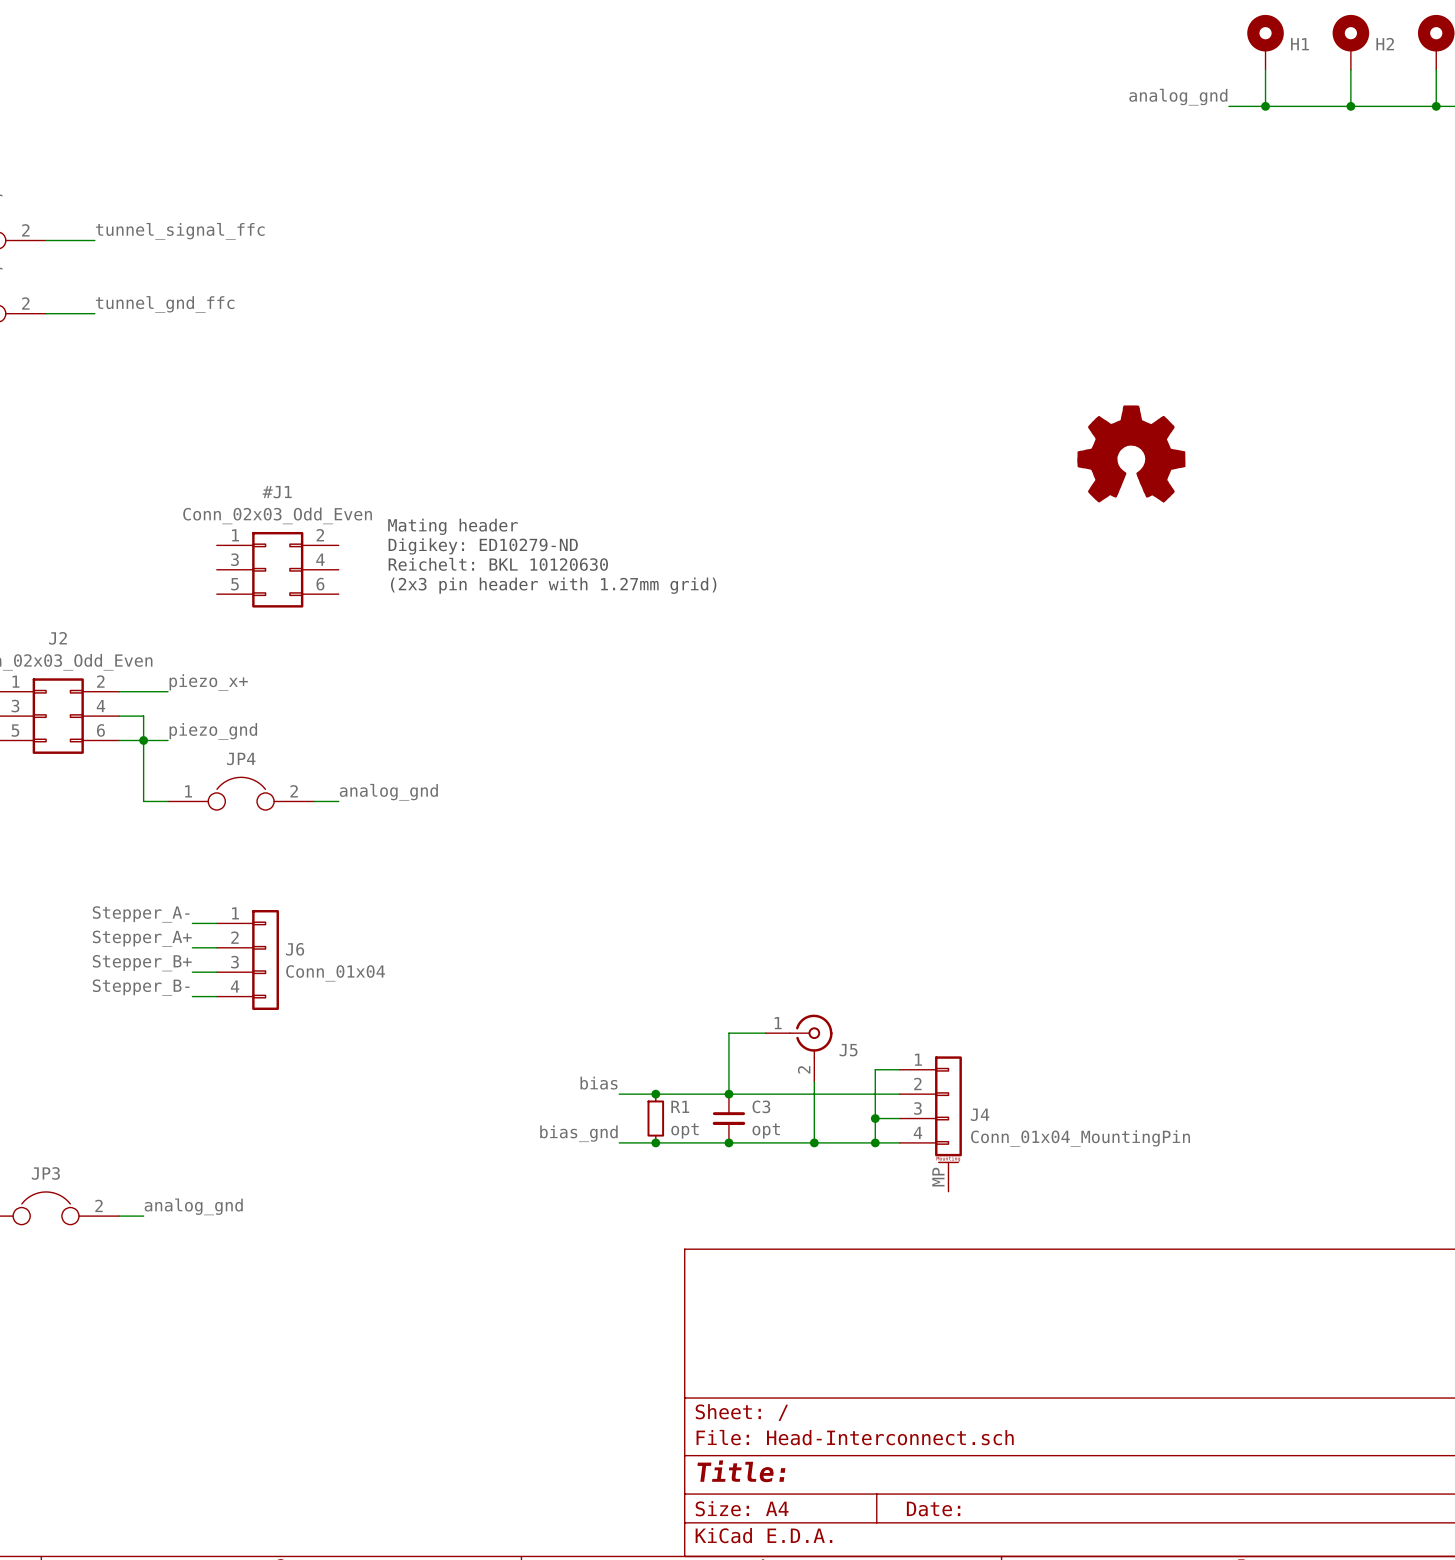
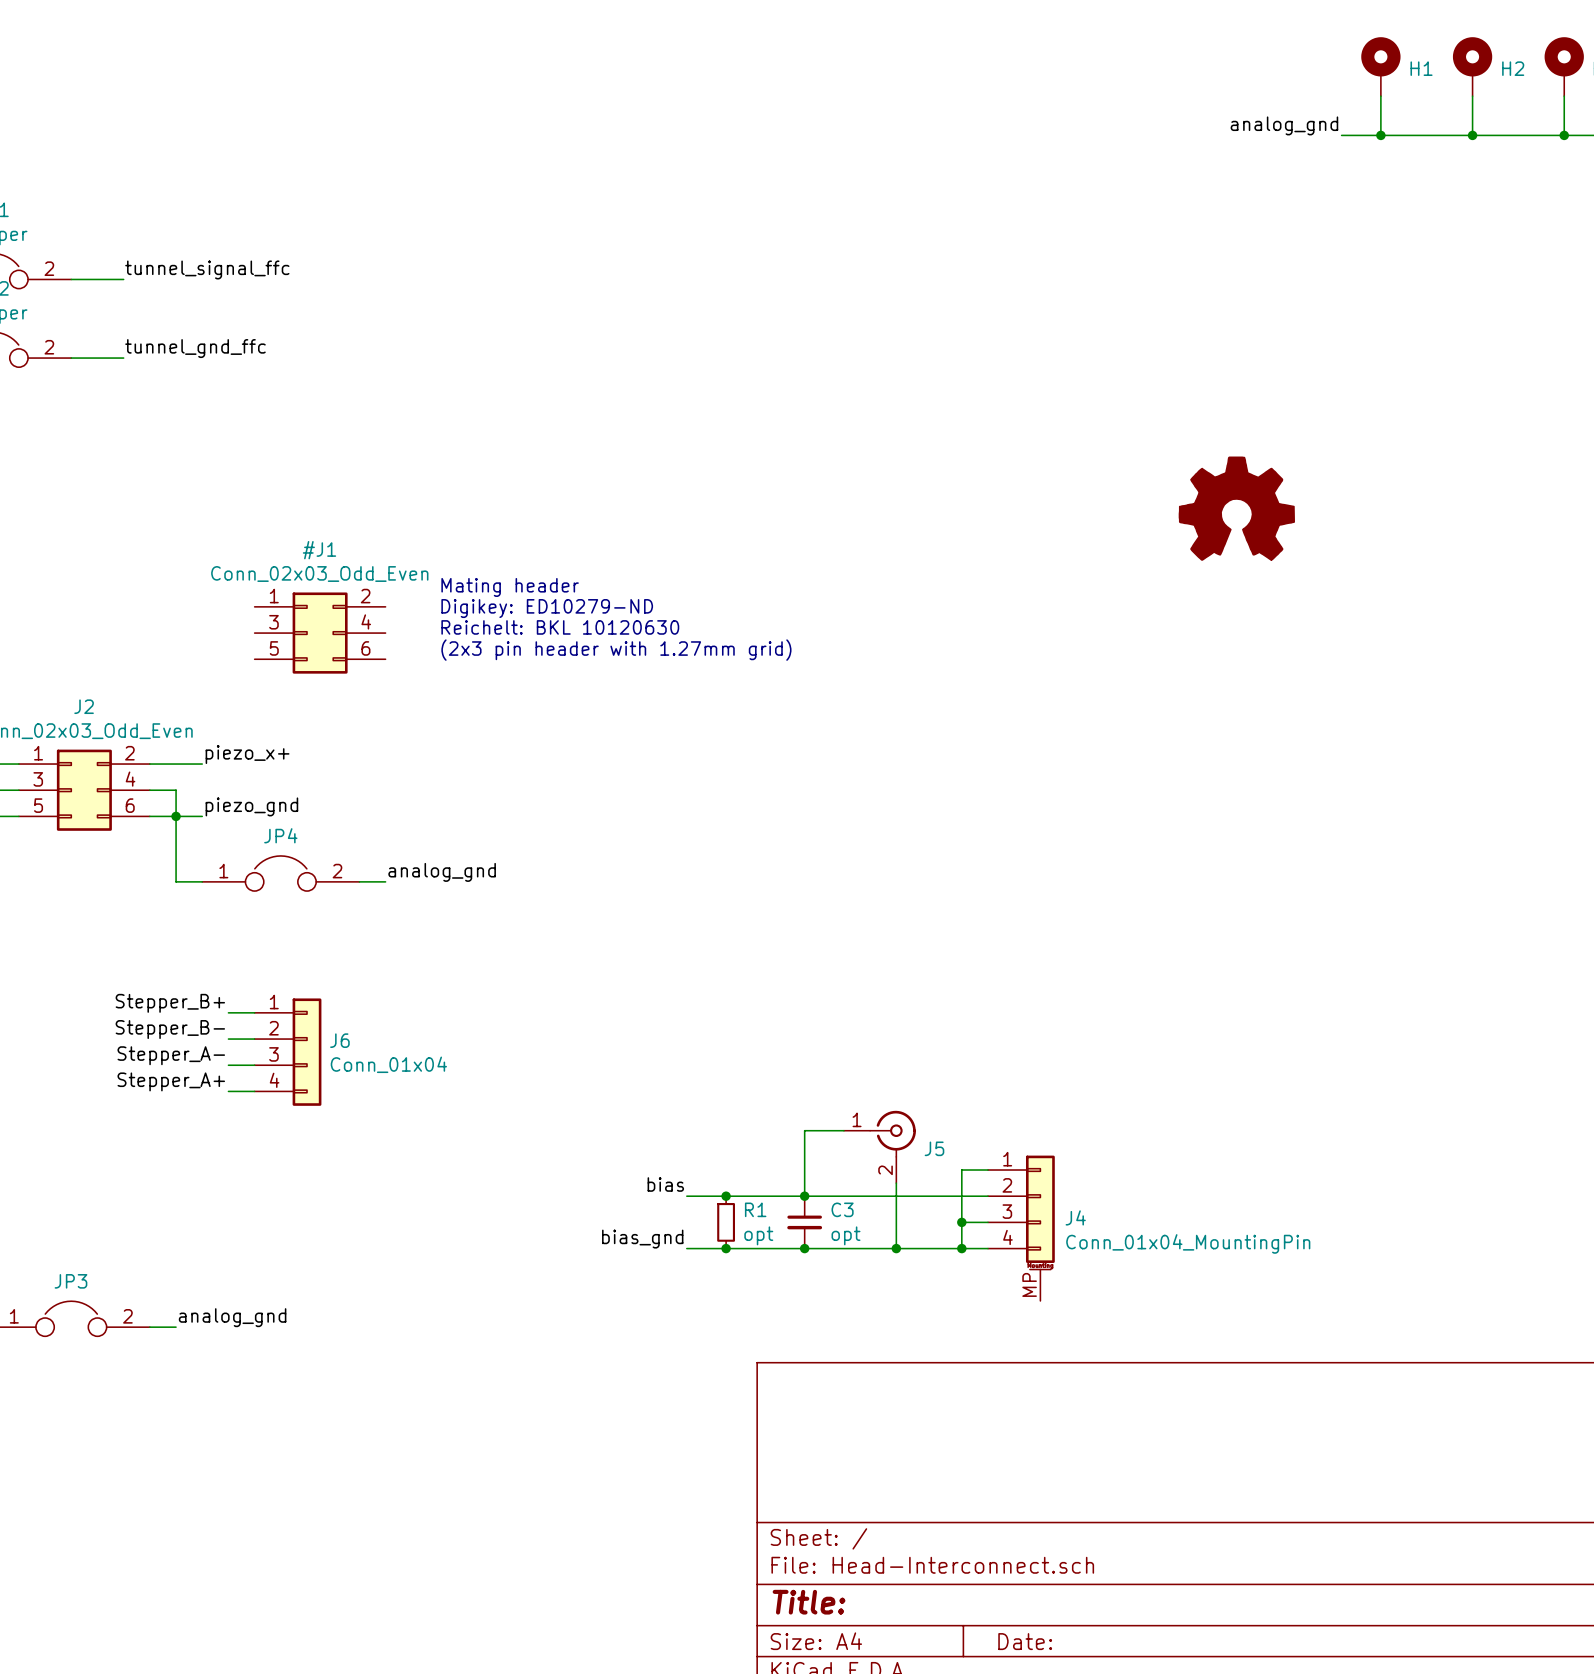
label: Stepper_A- (141, 914) -> Stepper_B+ (170, 1003)
label: Stepper_A+ (142, 938) -> Stepper_B- (170, 1029)
label: Stepper_B+ (142, 963) -> Stepper_A- (171, 1055)
label: Stepper_B- (141, 987) -> Stepper_A+ (171, 1081)

